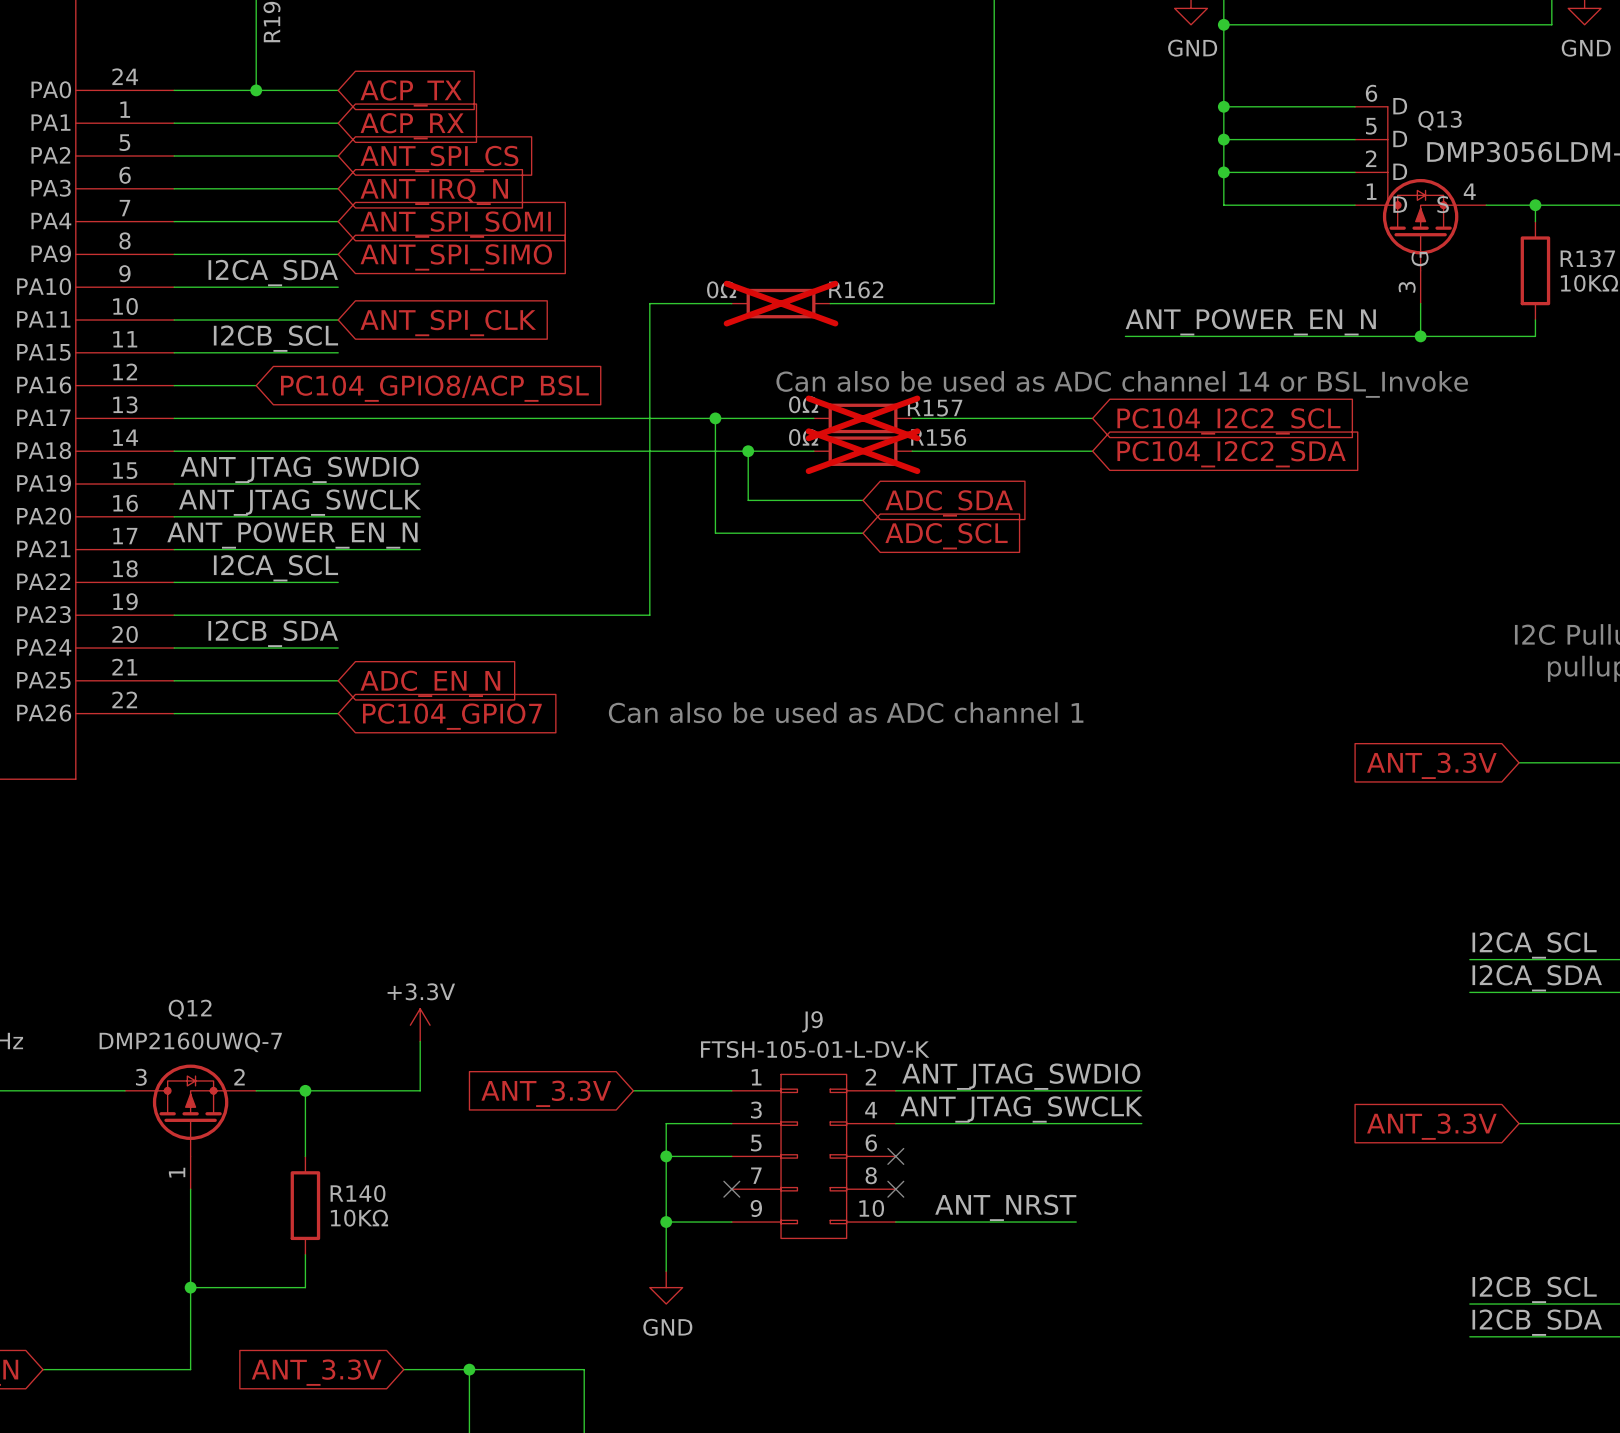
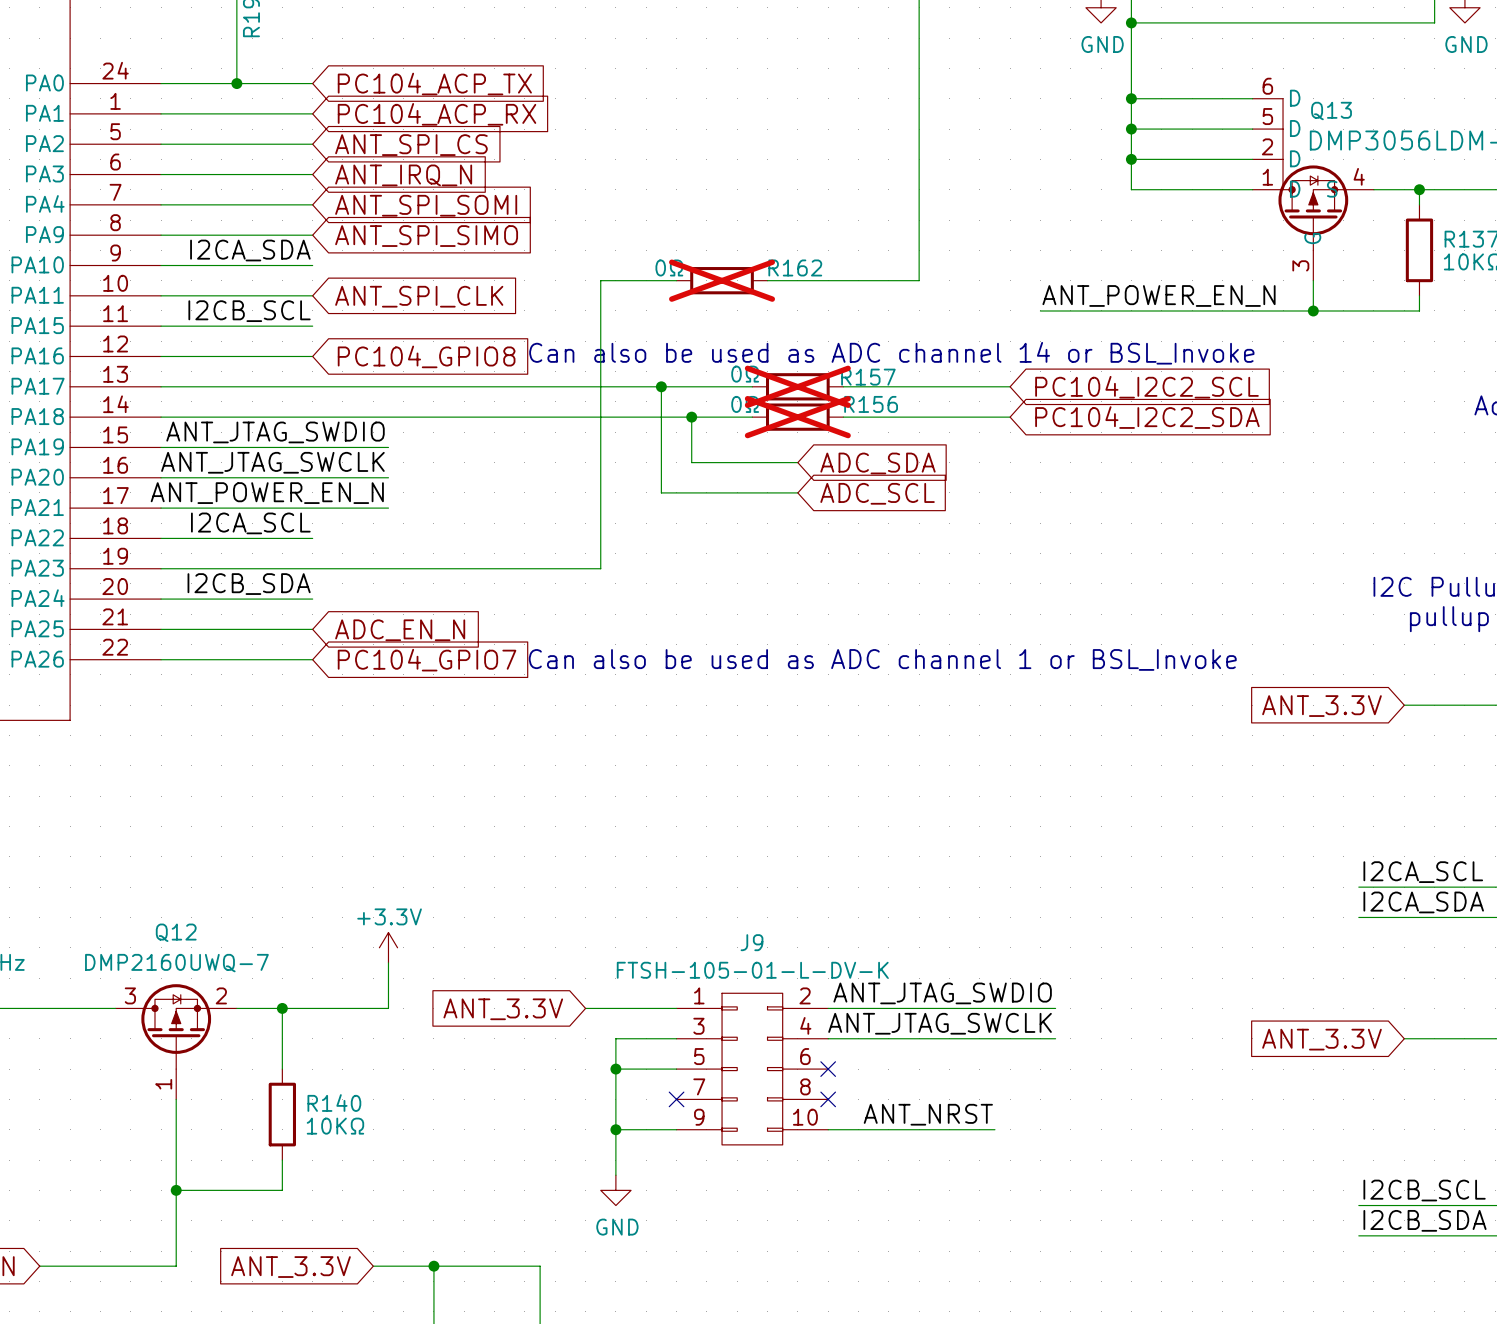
global label: ACP_TX (411, 93) -> PC104_ACP_TX (434, 84)
global label: ACP_RX (412, 126) -> PC104_ACP_RX (437, 114)
text position: Can also be used as ADC channel 14 or BSL_Invoke (1122, 384) -> Can also be used as ADC channel 14 or BSL_Invoke (891, 353)
wire: none -> (236, 356) (312, 356)
global label: PC104_GPIO8/ACP_BSL (434, 388) -> PC104_GPIO8 (426, 356)
text: Can also be used as ADC channel 1 (846, 712) -> Can also be used as ADC channel 1 or BSL_Invoke (882, 659)

